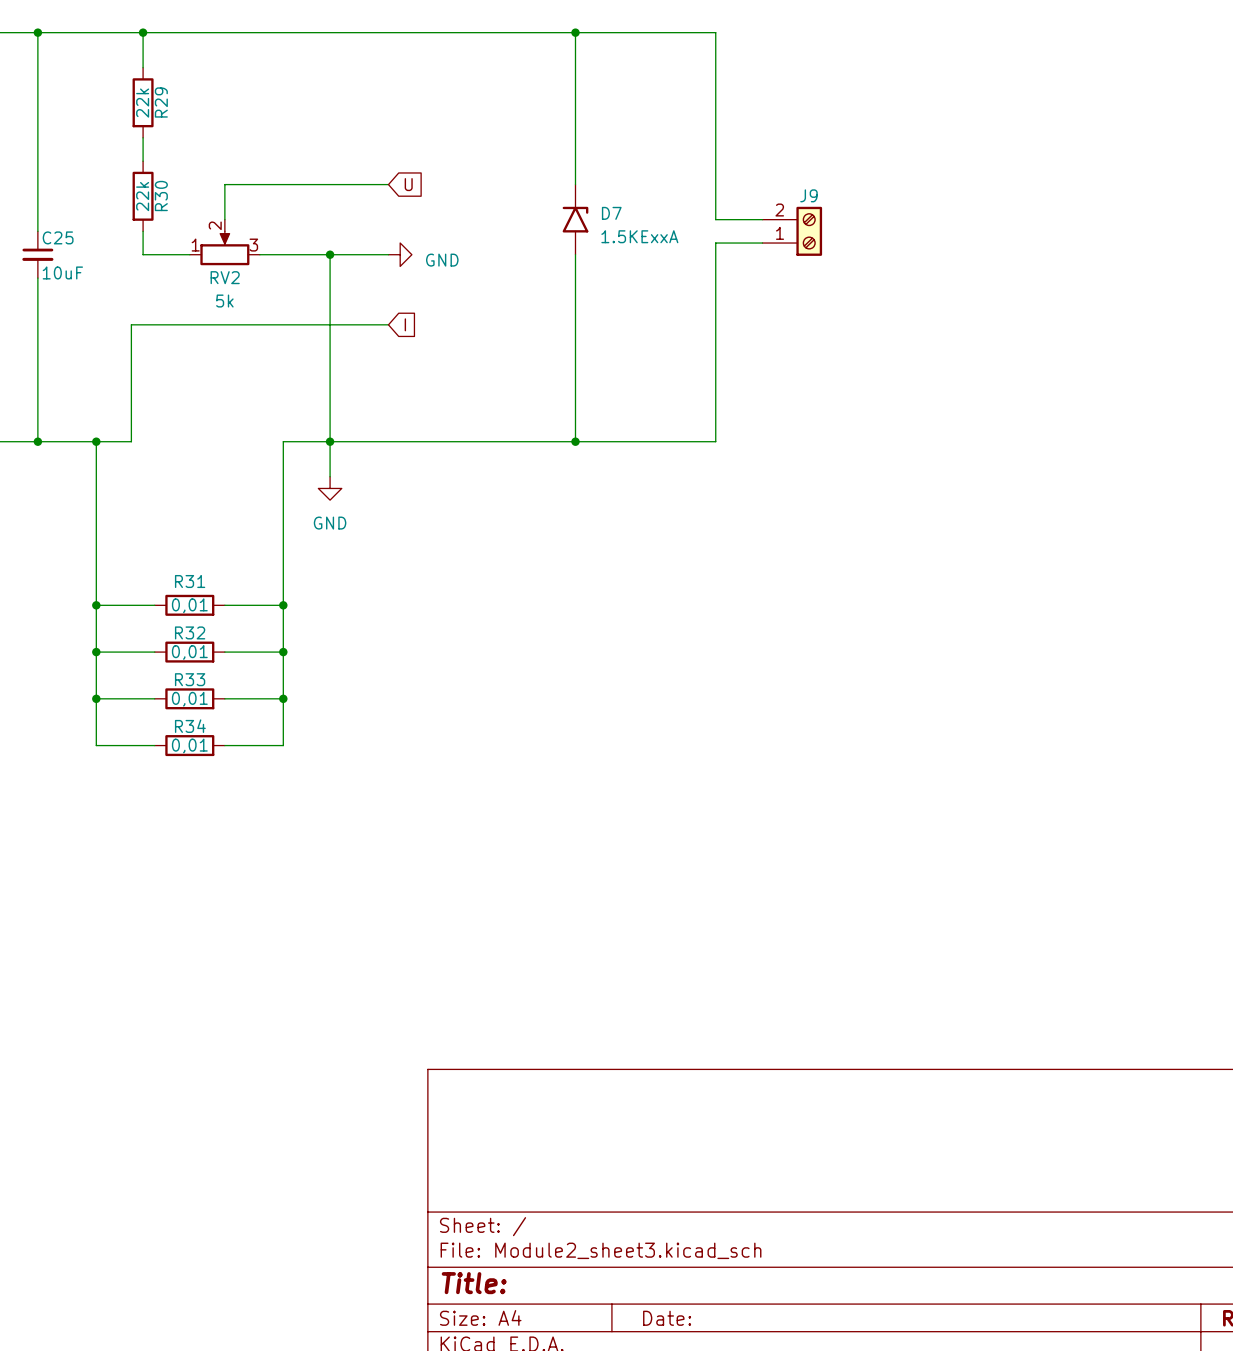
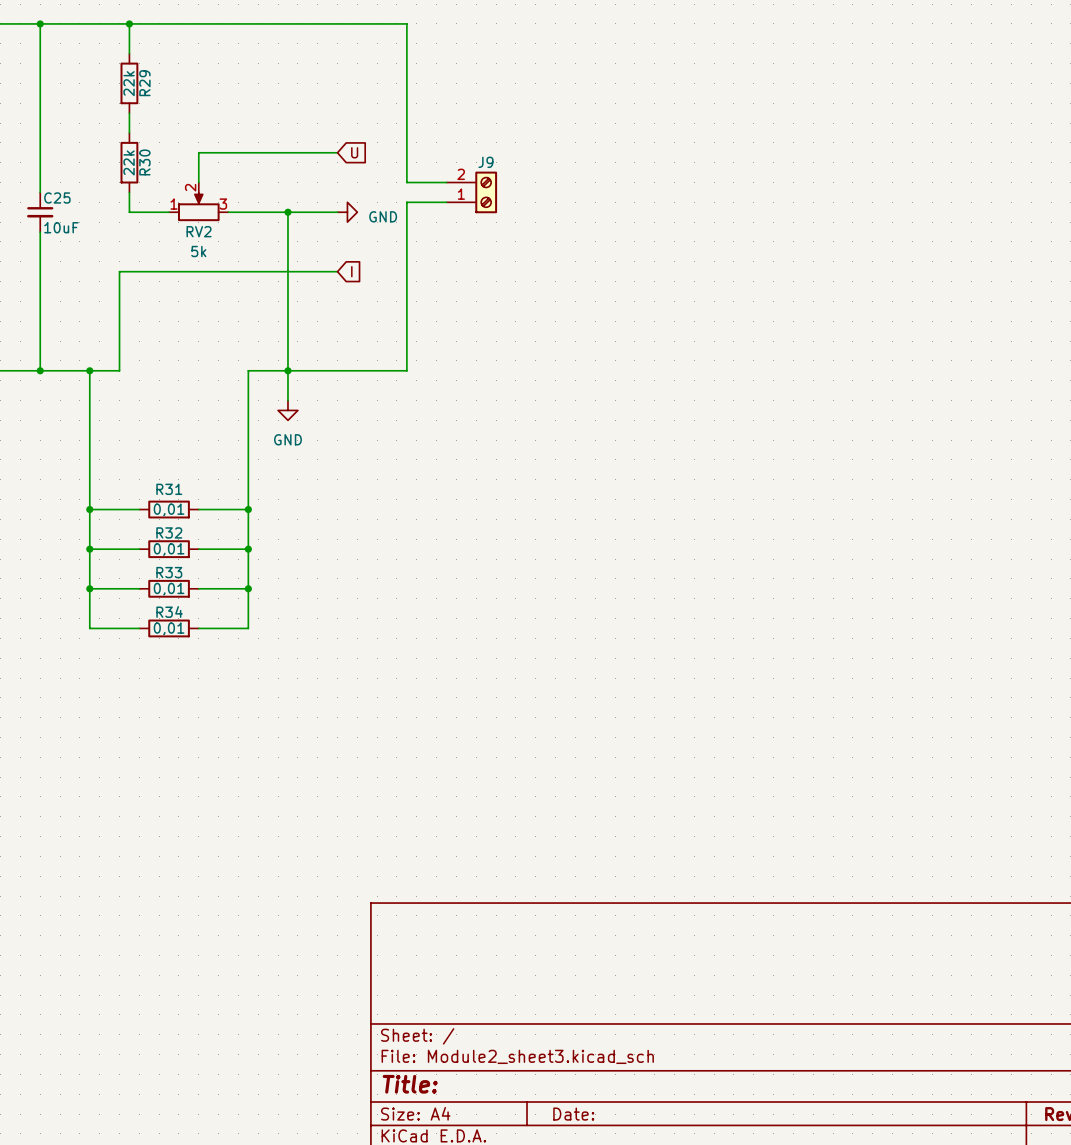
wire: (470, 32) (715, 32) (715, 219) (762, 219) -> (406, 23) (406, 182) (446, 182)
wire: (575, 32) (575, 184) -> none
junction: (575, 32) -> none
D7: 1.5KExxA (575, 219) -> none
J9 position: (792, 231) -> (471, 192)
wire: (762, 243) (715, 243) (715, 441) (470, 441) -> (446, 202) (406, 202) (406, 370)
wire: (575, 254) (575, 441) -> none
junction: (575, 441) -> none

